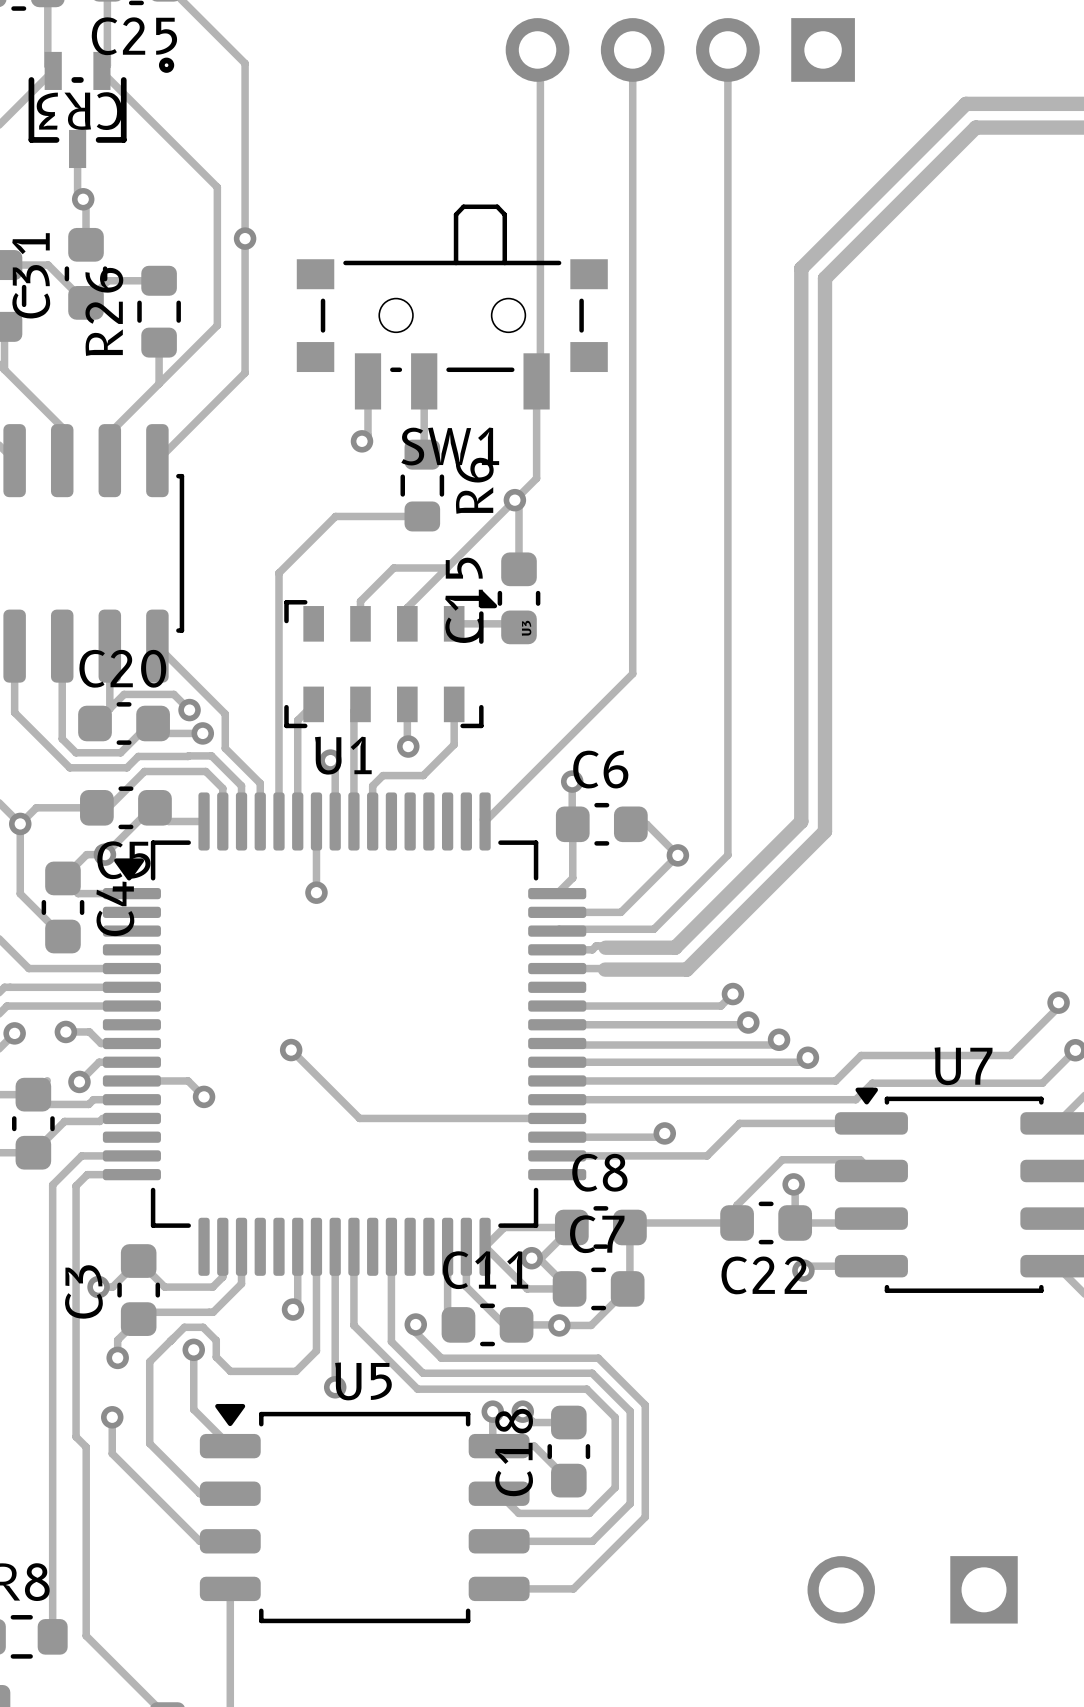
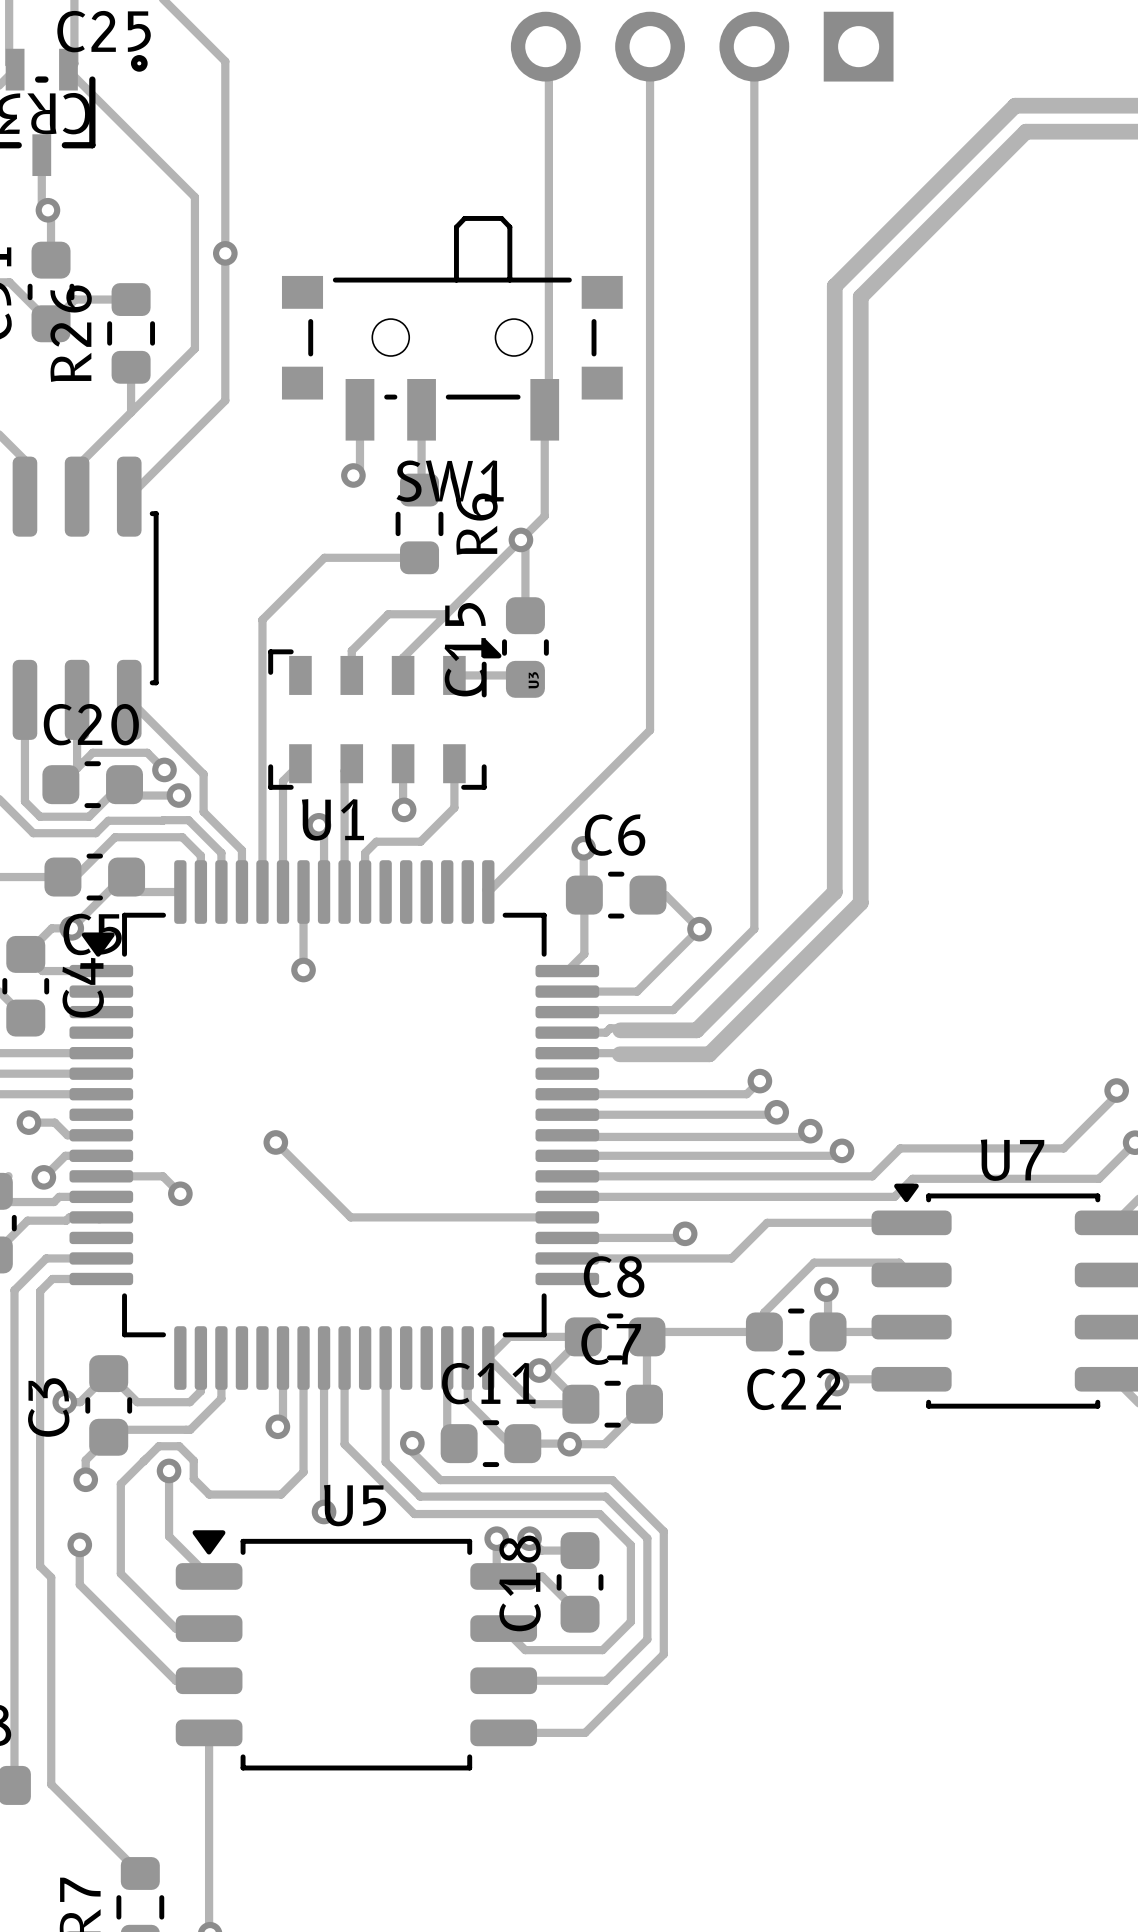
part: (912, 1589) -> none

